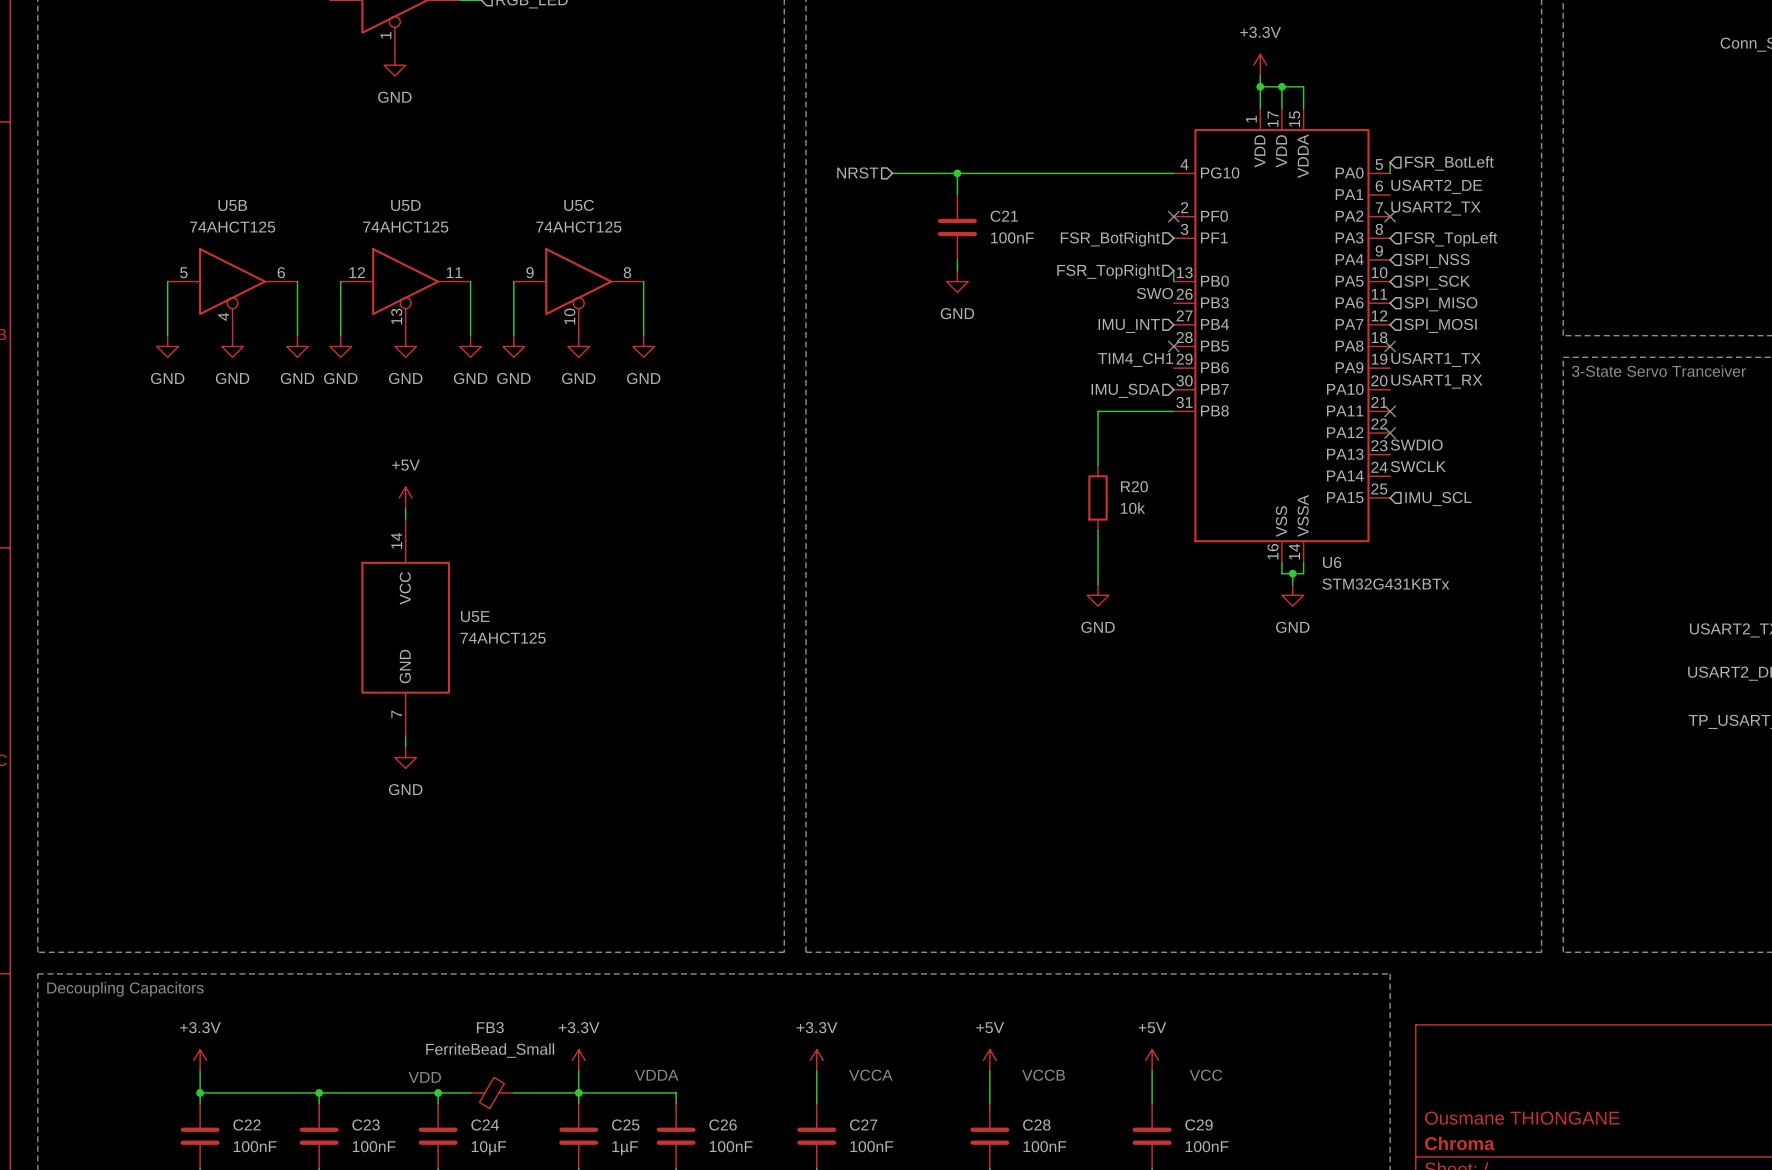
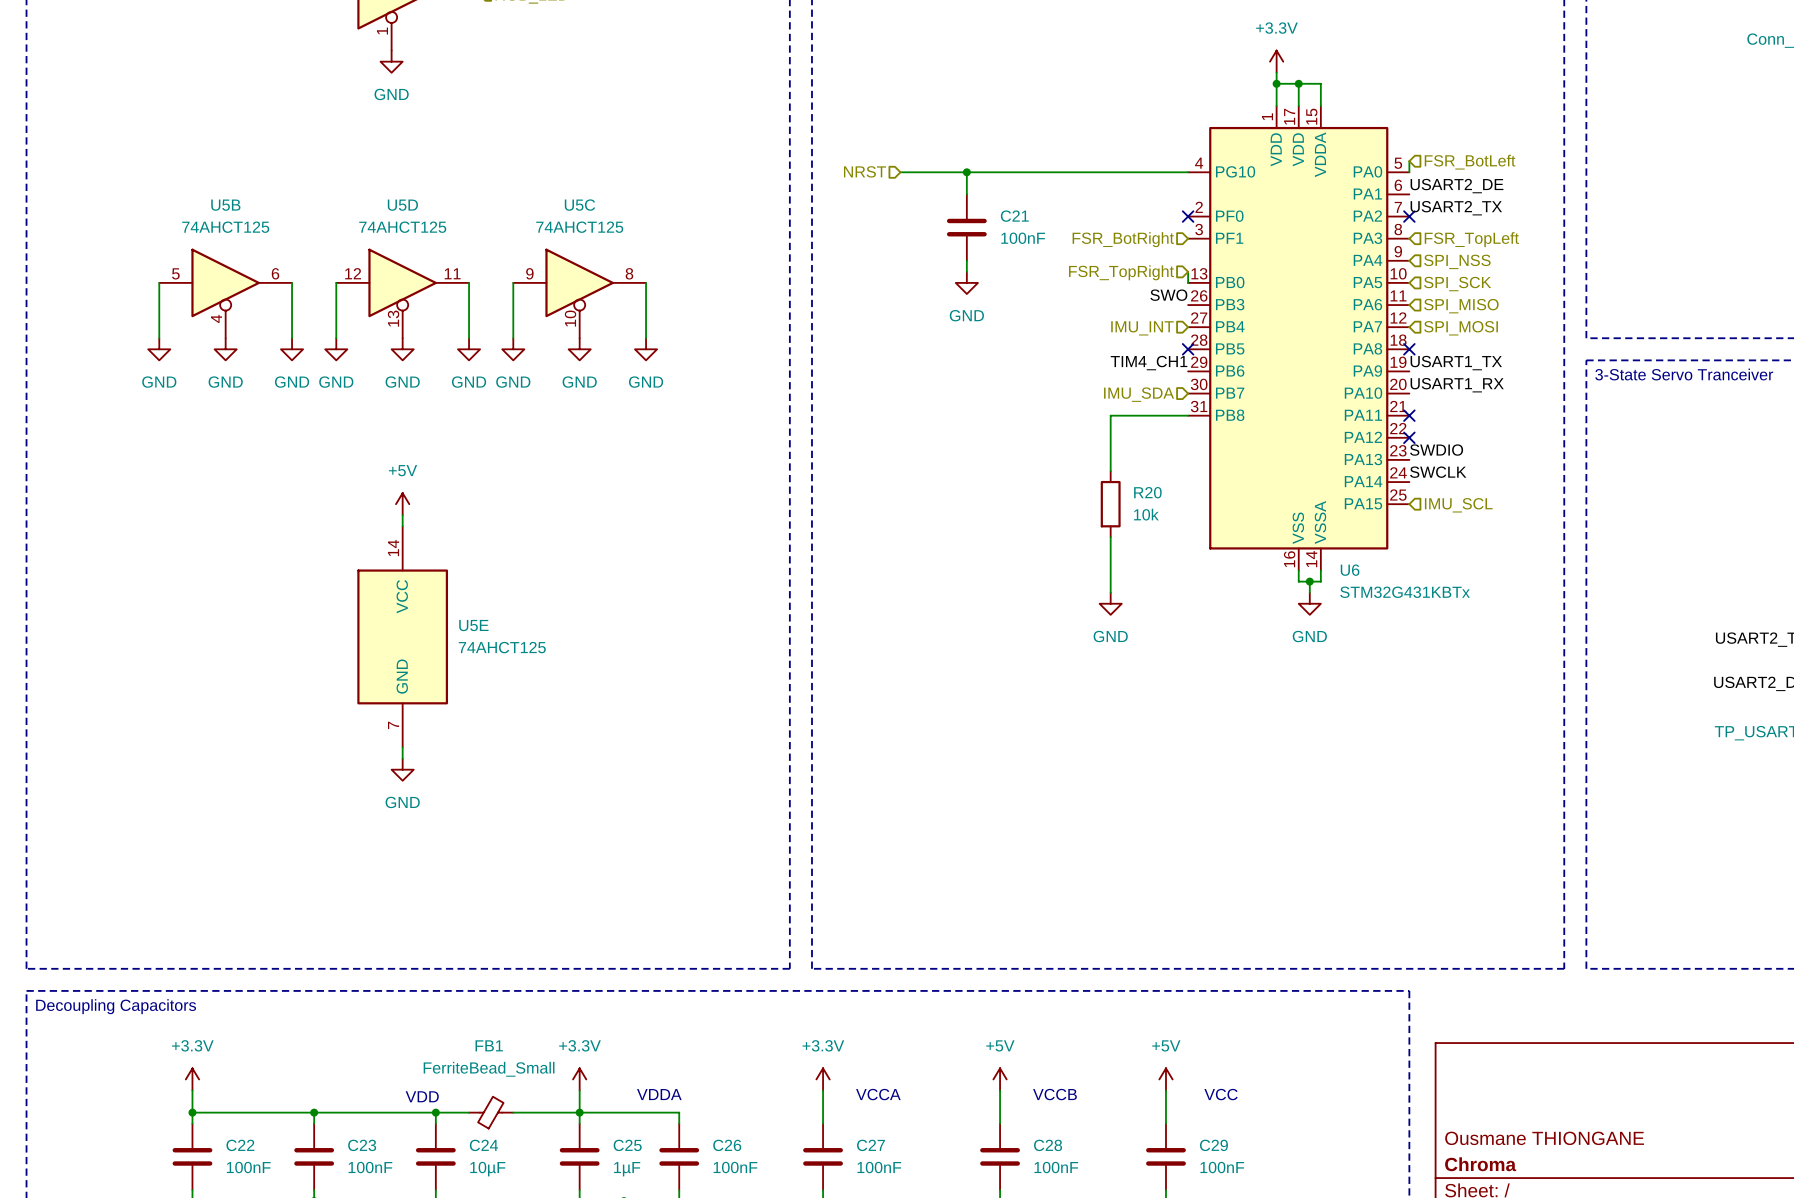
FB3 name: FB3 (490, 1027) -> FB1 (489, 1045)

